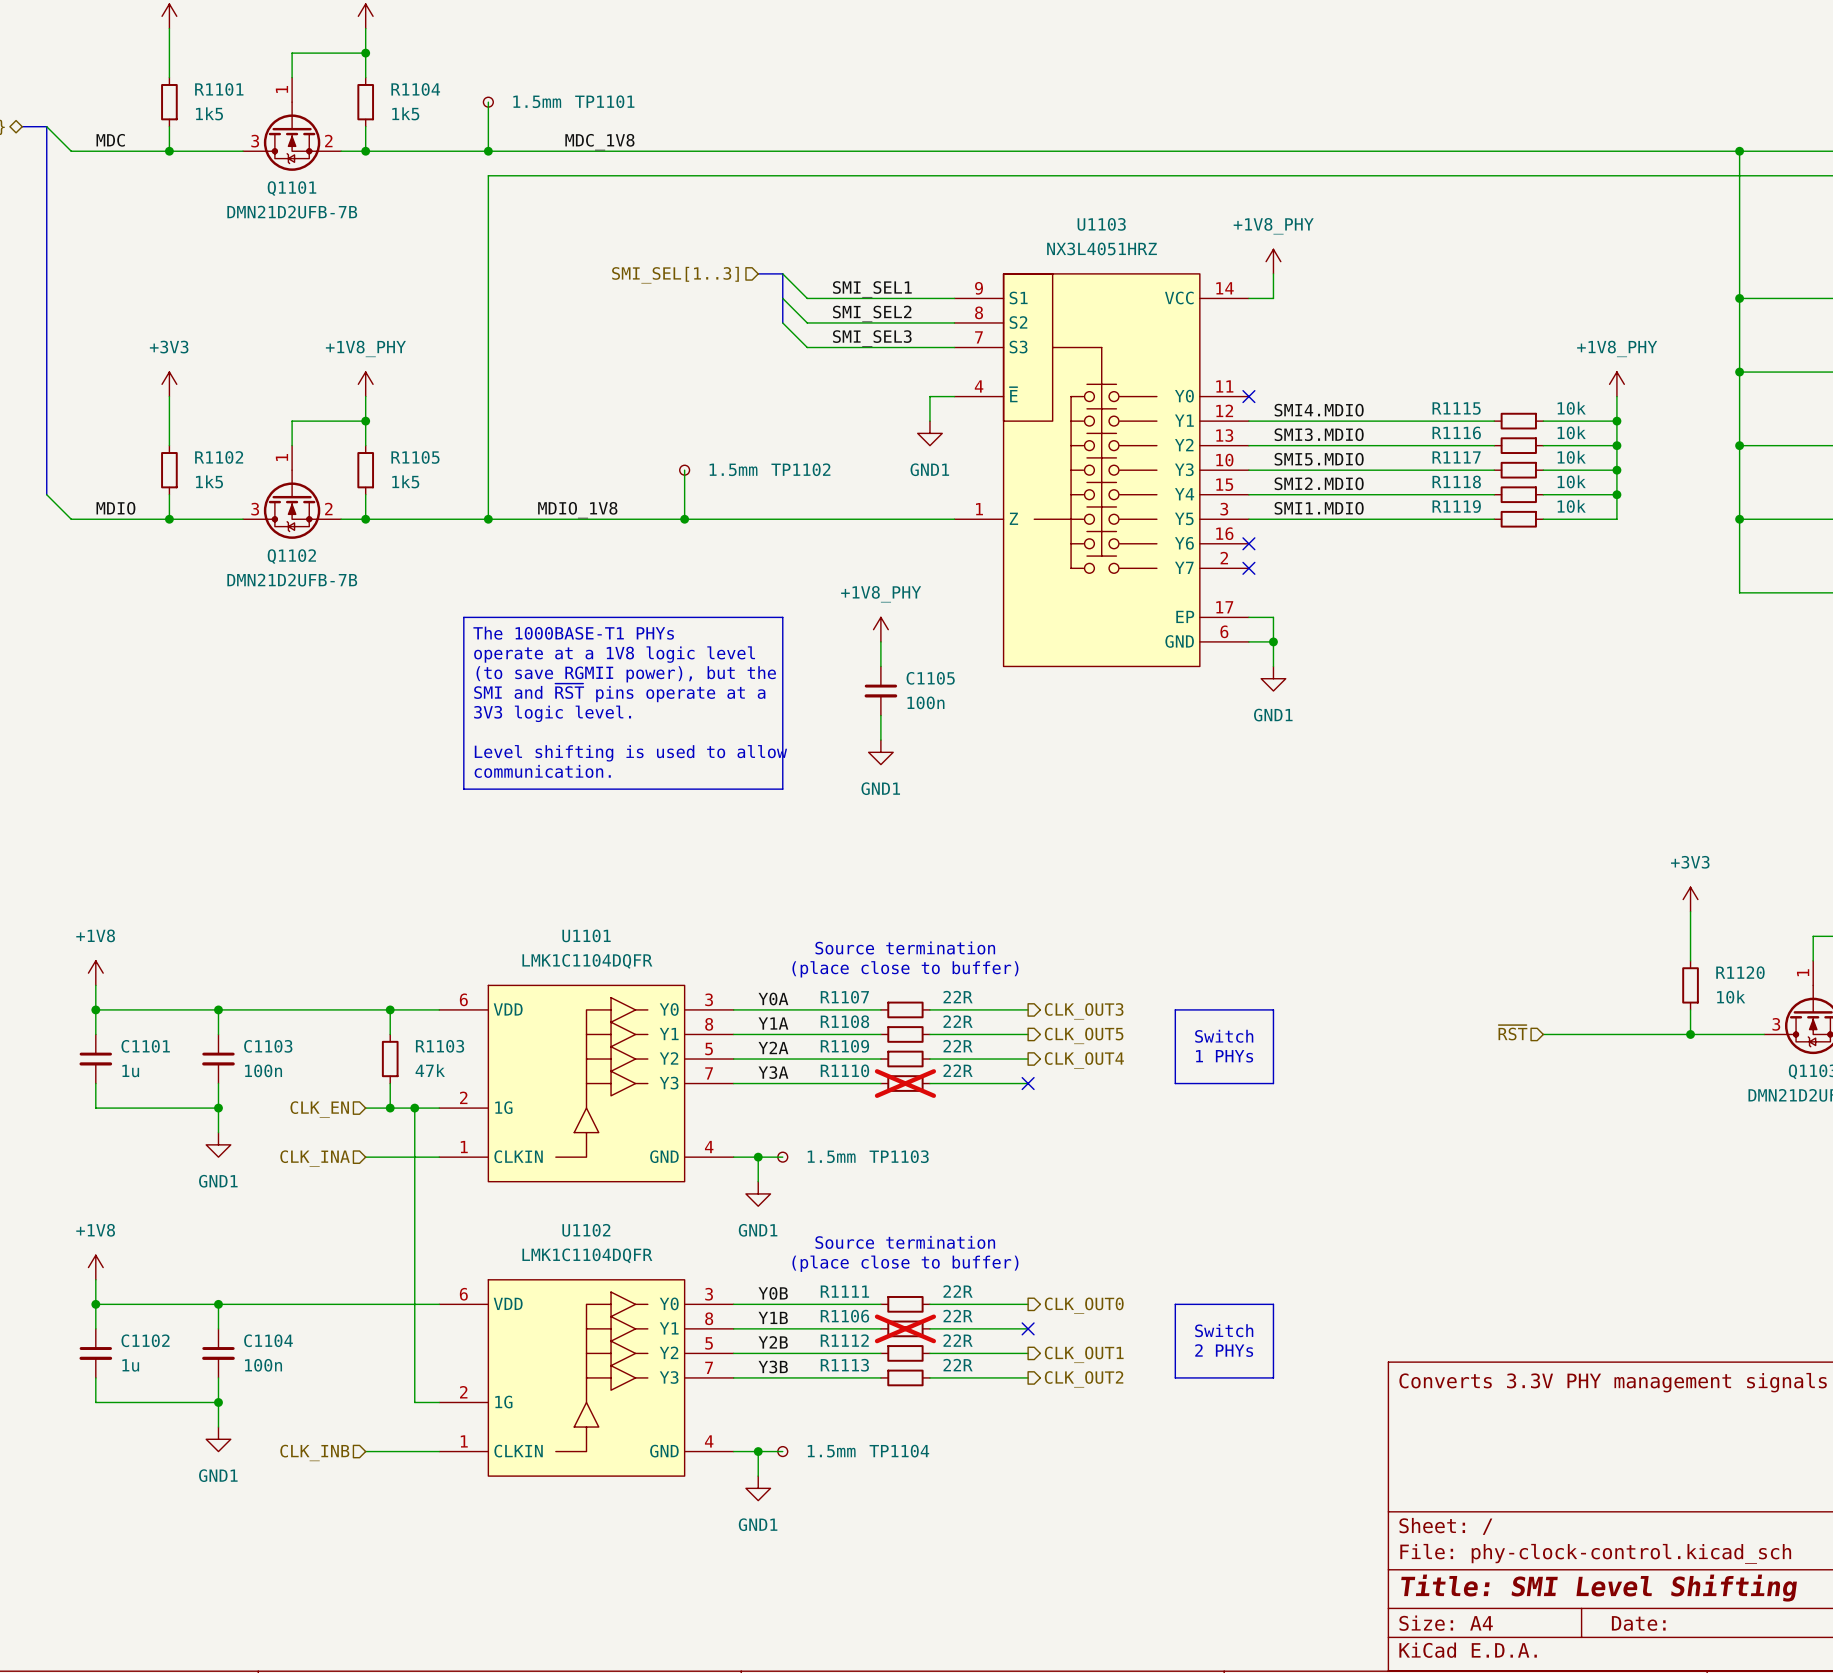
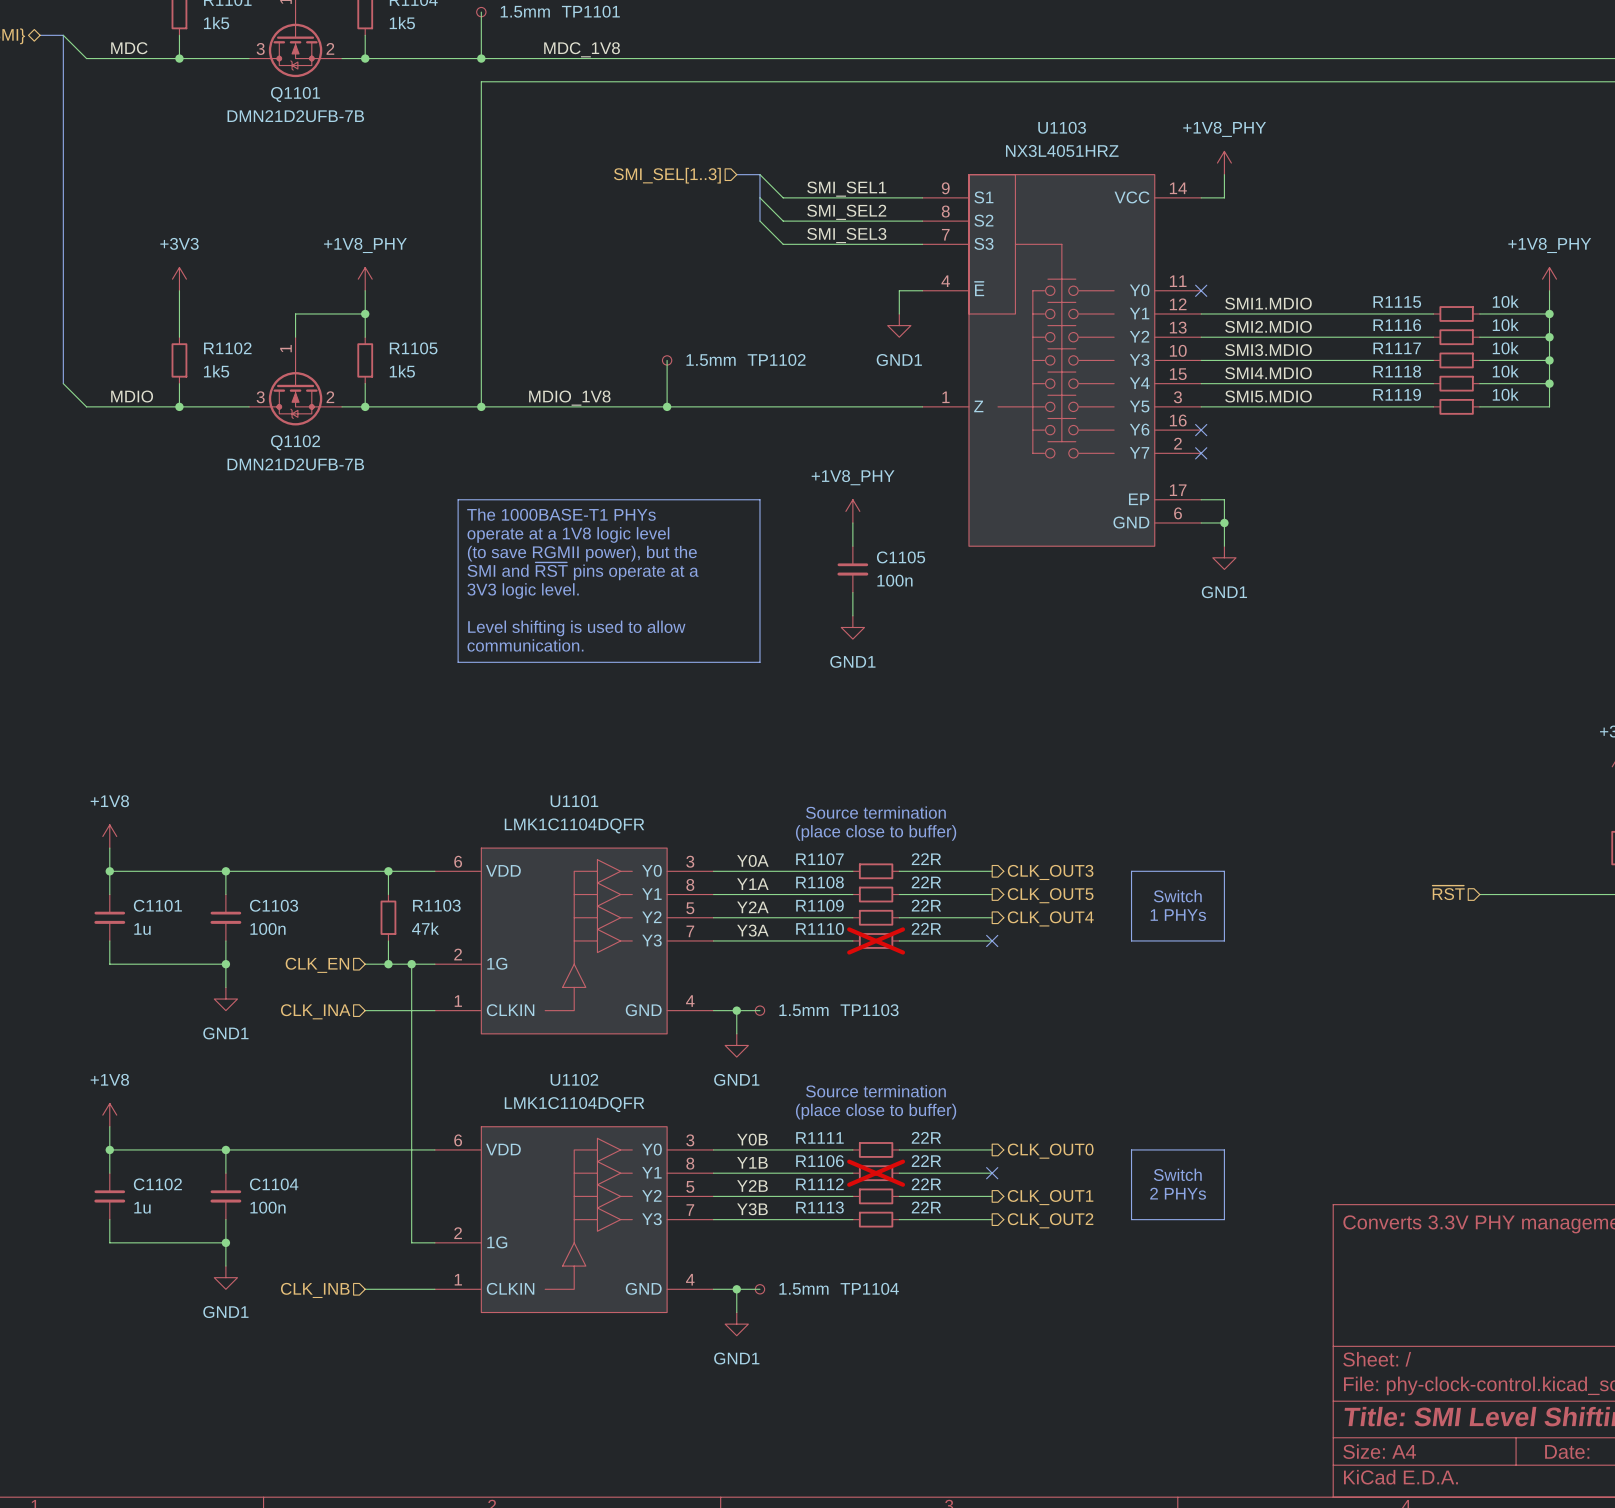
label: SMI4.MDIO (1319, 410) -> SMI1.MDIO (1268, 303)
label: SMI3.MDIO (1319, 434) -> SMI2.MDIO (1268, 326)
label: SMI5.MDIO (1319, 459) -> SMI3.MDIO (1268, 350)
label: SMI2.MDIO (1319, 483) -> SMI4.MDIO (1268, 373)
label: SMI1.MDIO (1319, 508) -> SMI5.MDIO (1268, 396)

